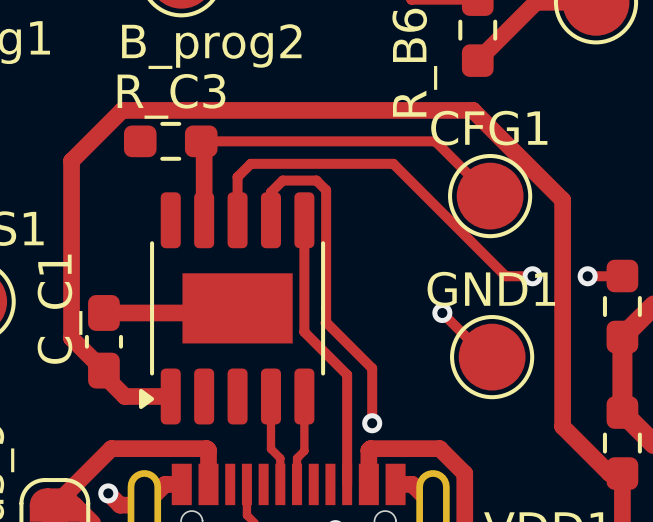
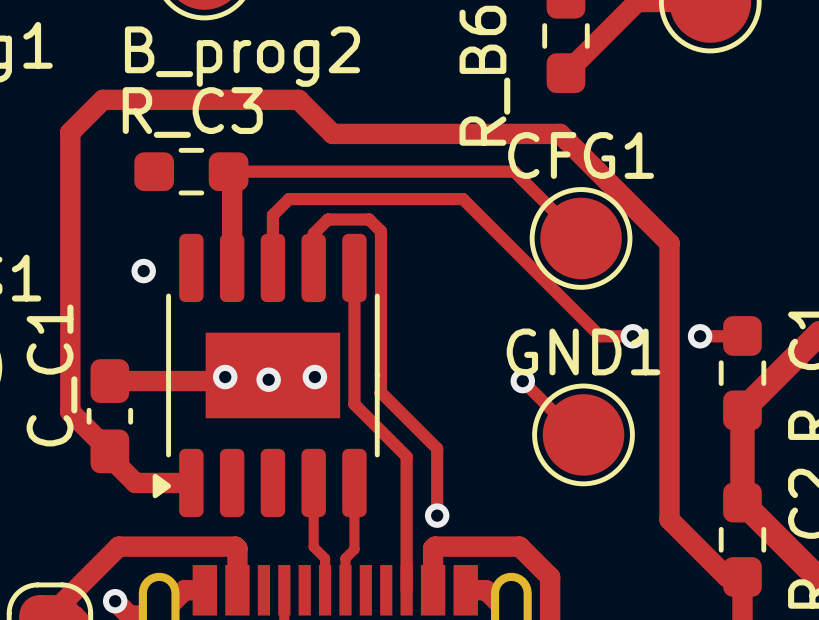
track: (286, 110) (122, 110) (71, 161) -> (332, 133) (298, 99) (102, 99) (70, 132) (70, 195)
via: none -> (143, 271)
via: none -> (225, 377)
via: none -> (314, 377)
via: none -> (268, 379)

